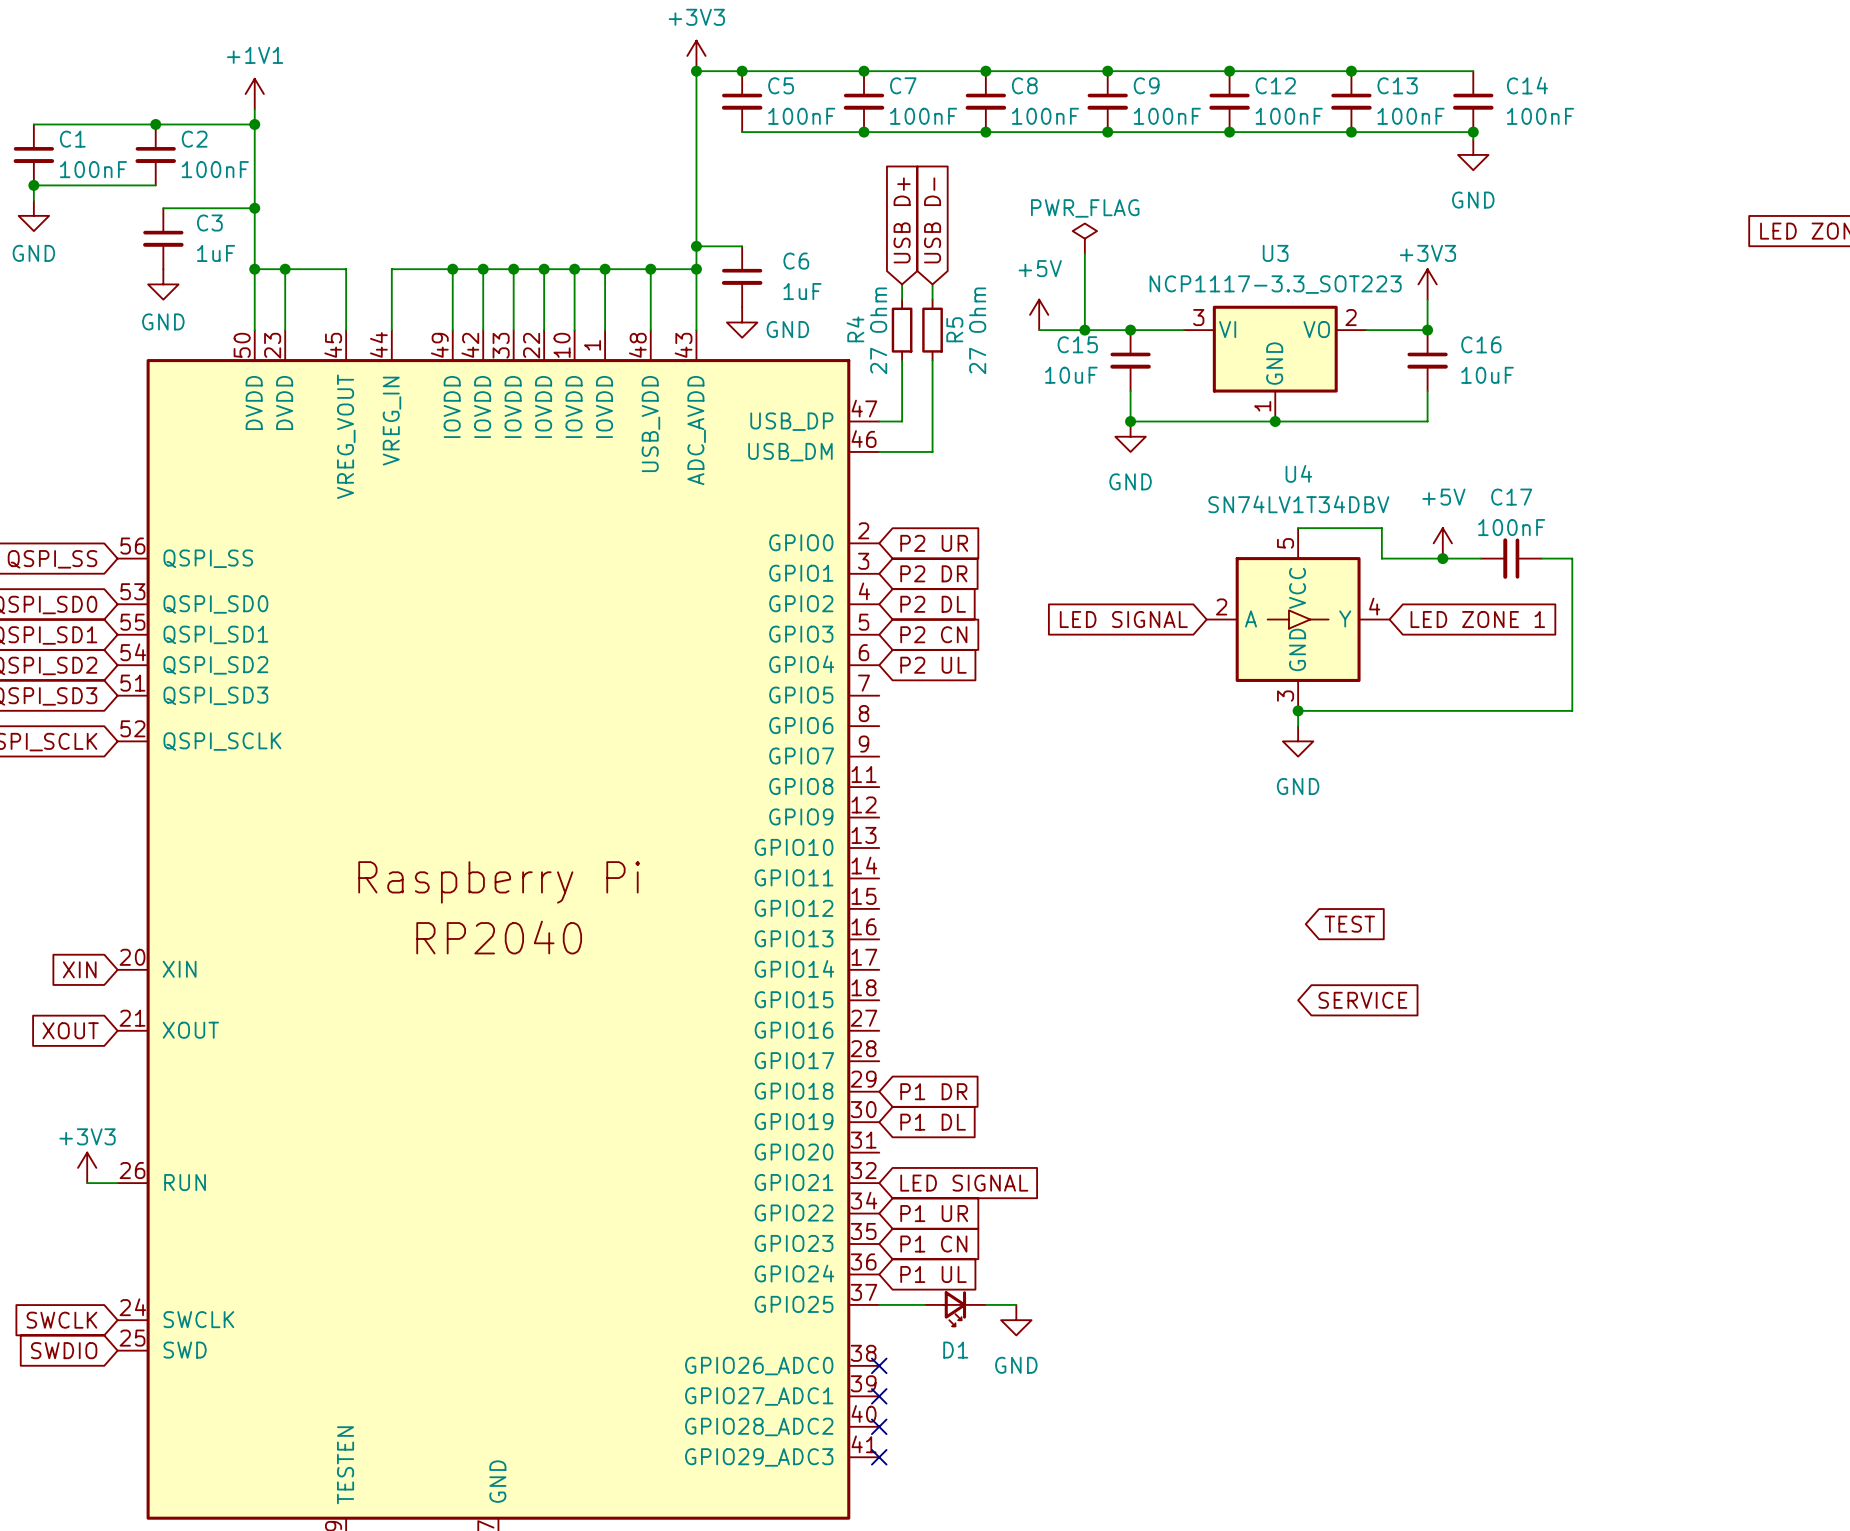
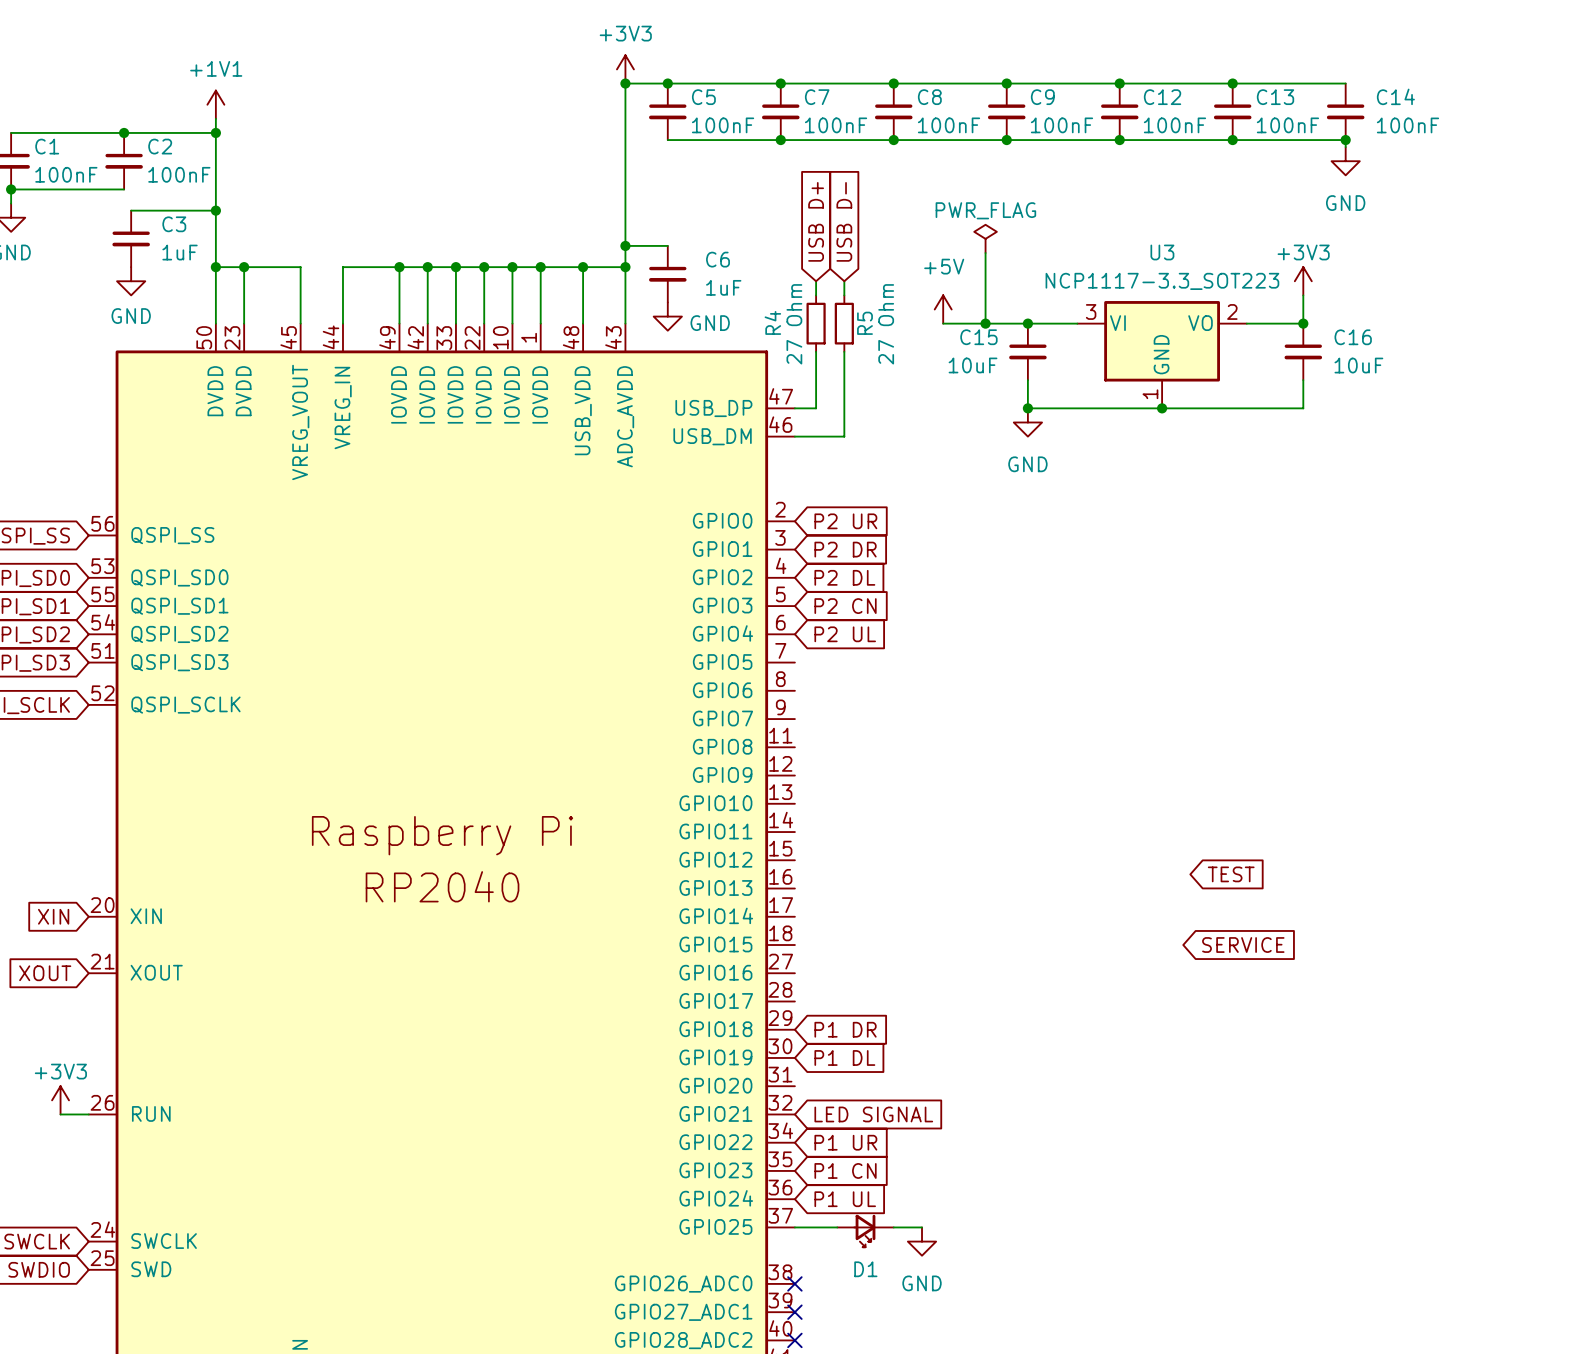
wire: (1298, 528) (1381, 528) (1381, 558) (1480, 558) -> none
power symbol: +5V (1442, 543) -> none
junction: (1442, 558) -> none
C17: 100nF (1511, 558) -> none
wire: (1541, 558) (1572, 558) (1572, 710) (1298, 710) (1298, 726) -> none
global label: LED SIGNAL (1123, 619) -> none
U4: SN74LV1T34DBV (1298, 619) -> none
global label: LED ZONE 1 (1477, 619) -> none
junction: (1298, 710) -> none
power symbol: GND (1298, 741) -> none

